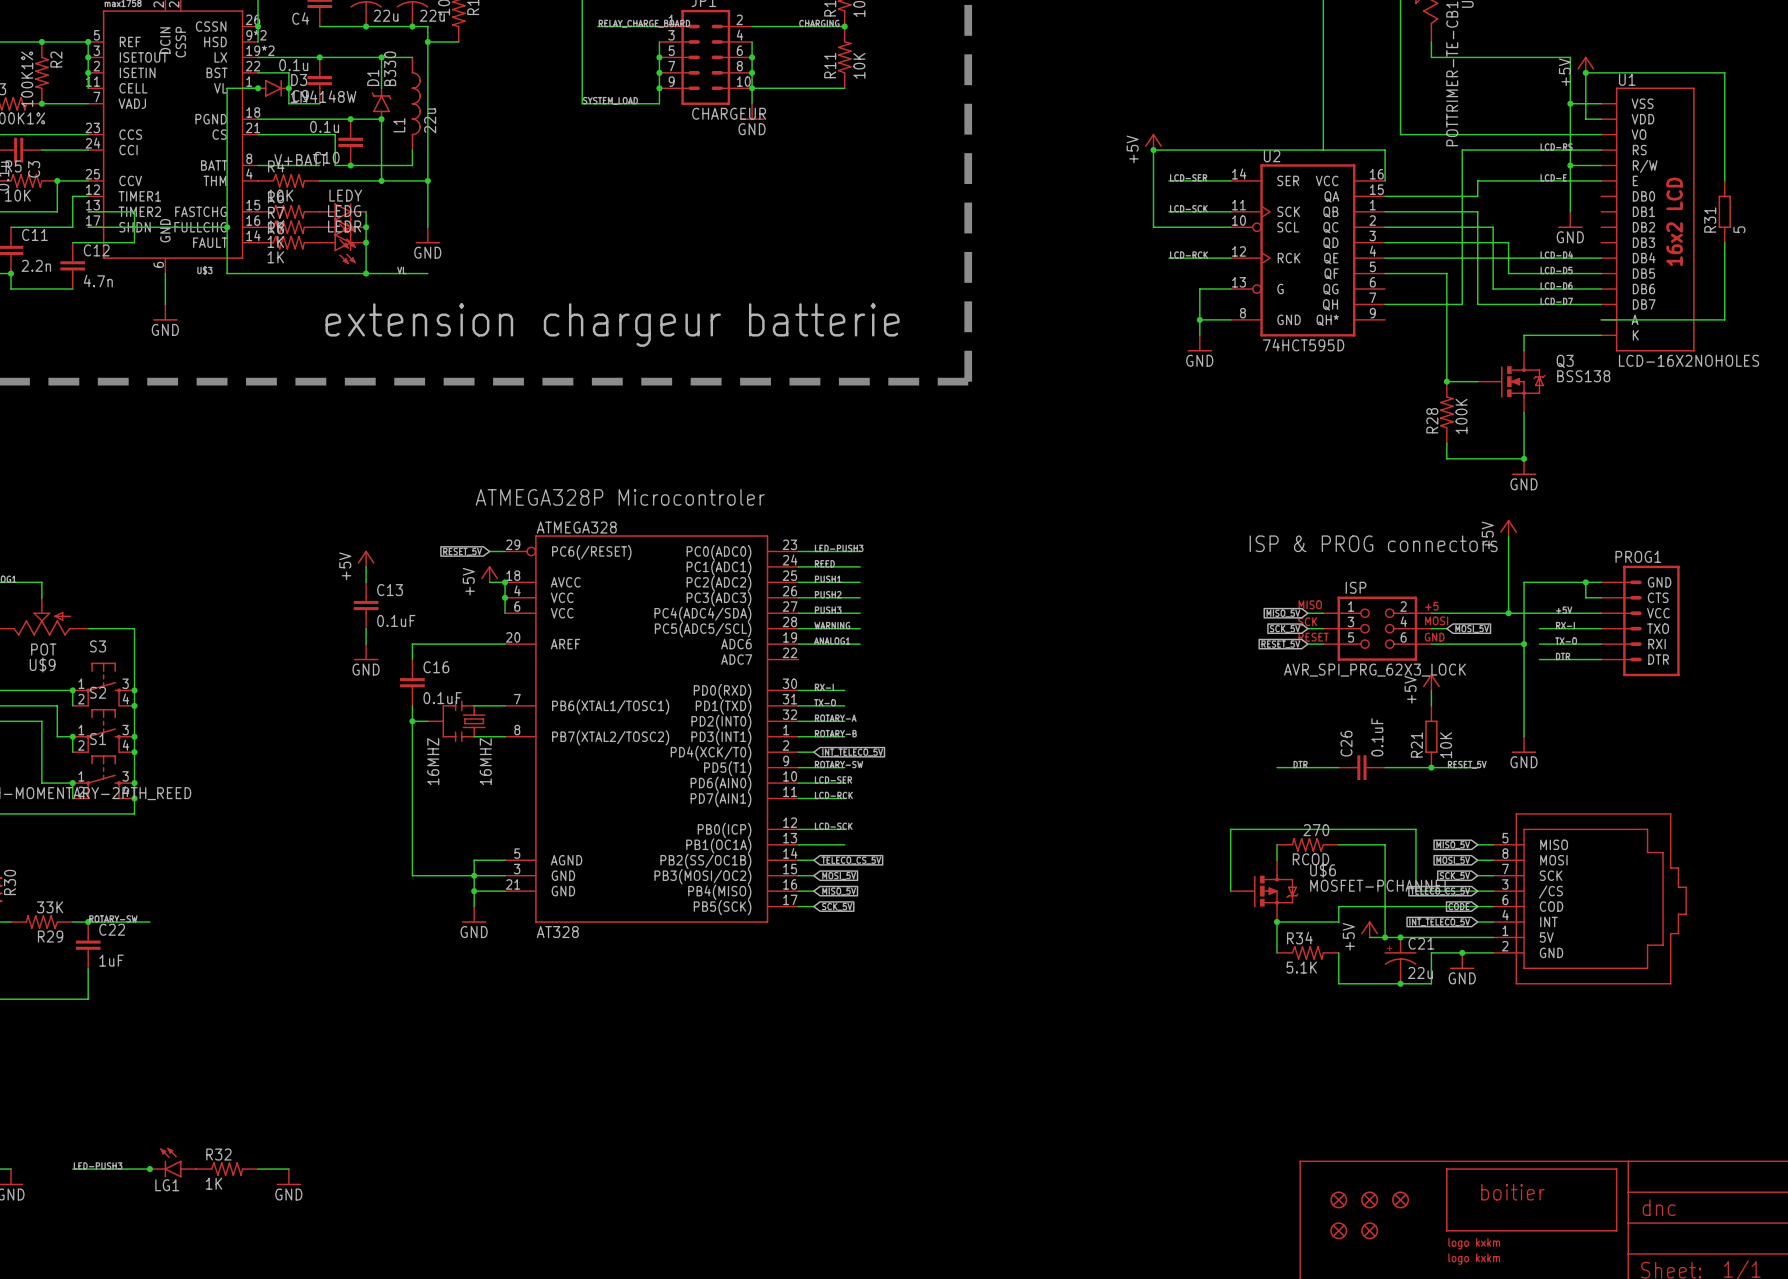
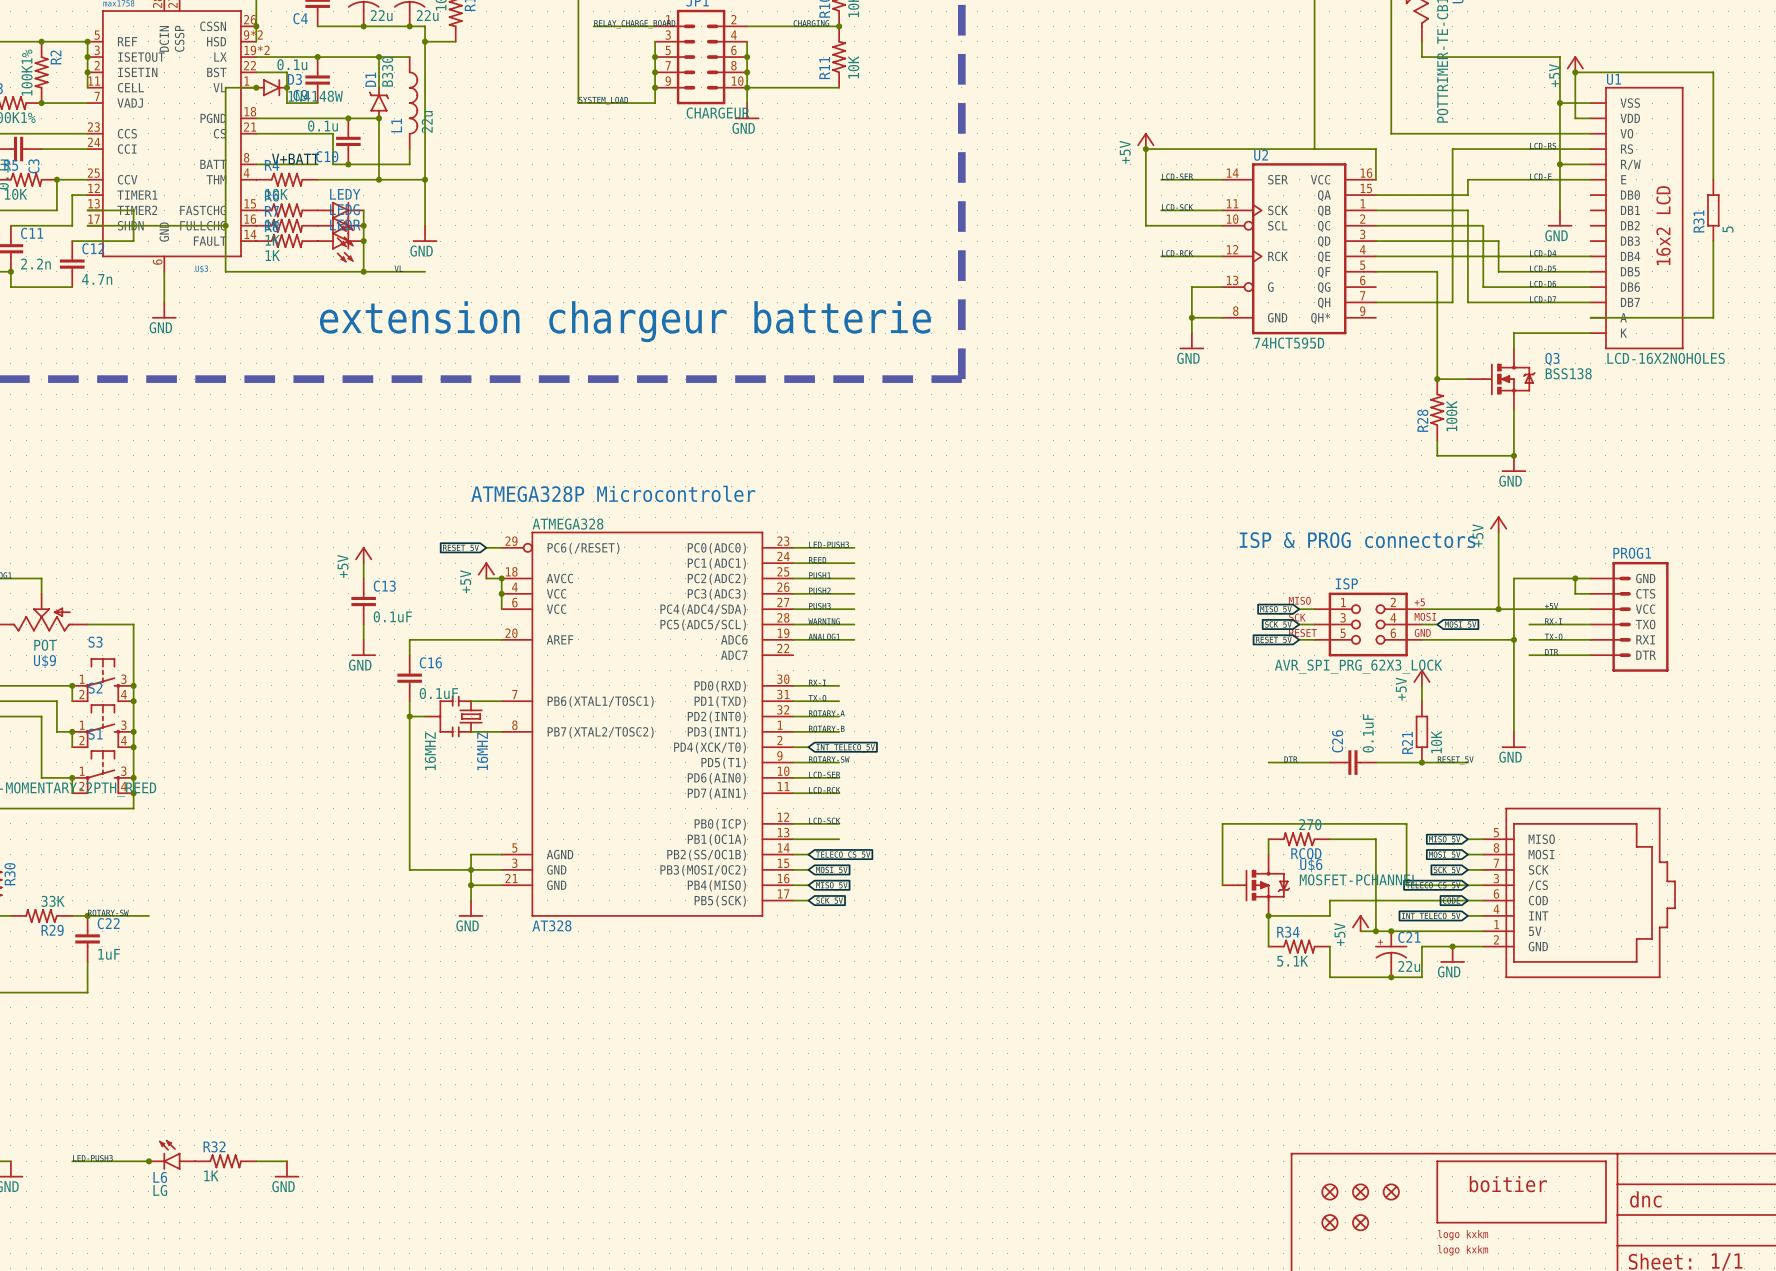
LG1 name: LG1 (167, 1185) -> L6 (160, 1177)
LG1 value: none -> LG (160, 1190)

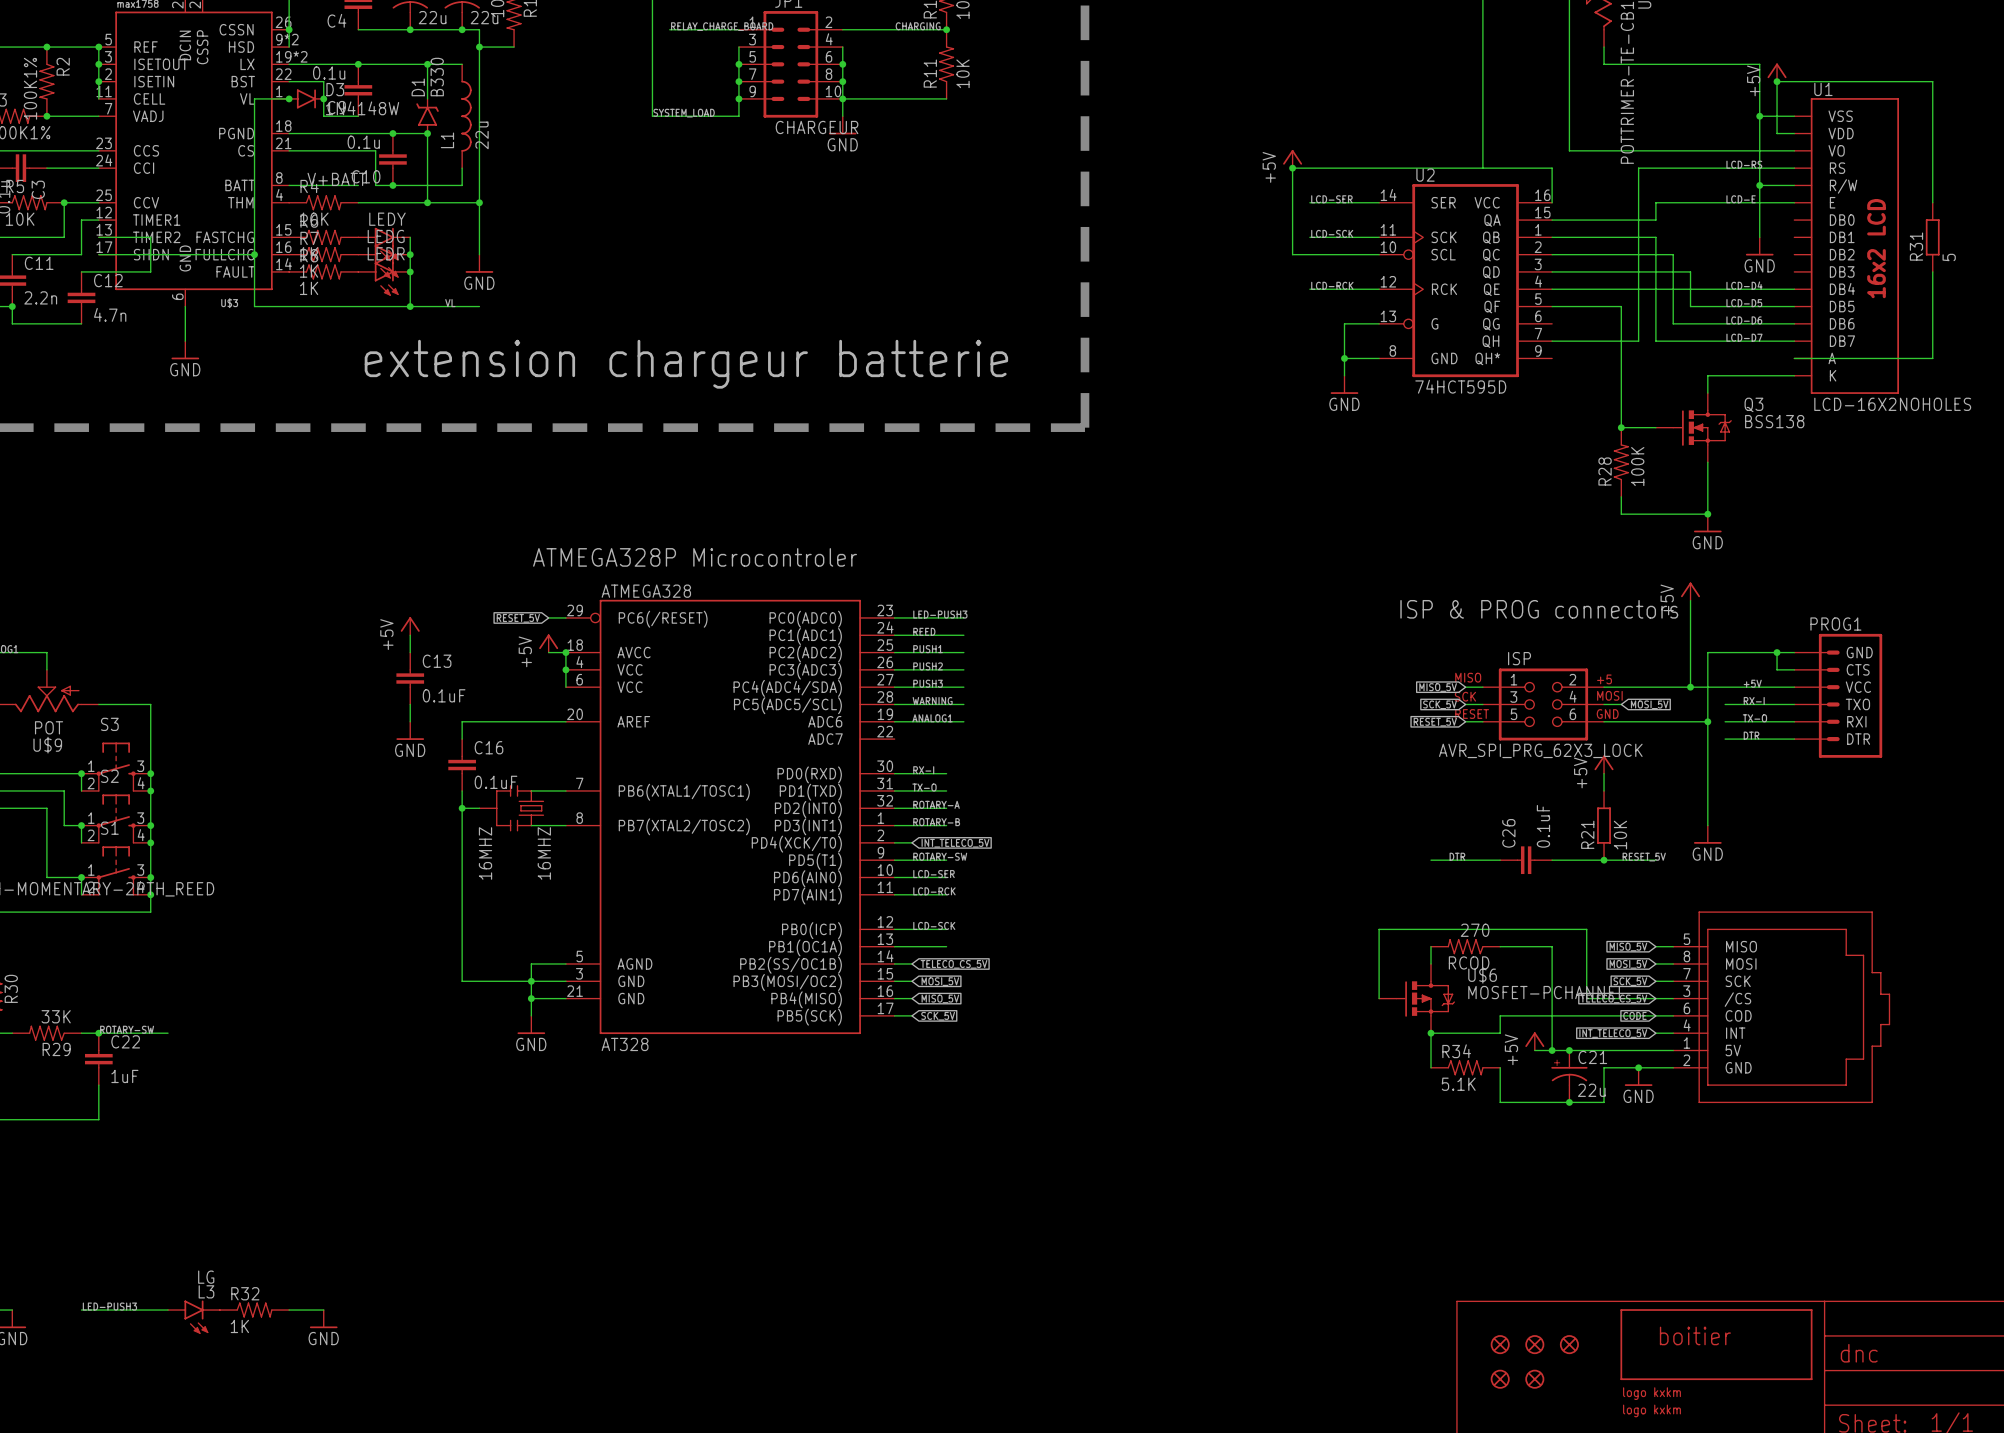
L6: LG (171, 1154) -> none
junction: (148, 1161) -> none
L3: none -> LG (193, 1317)

